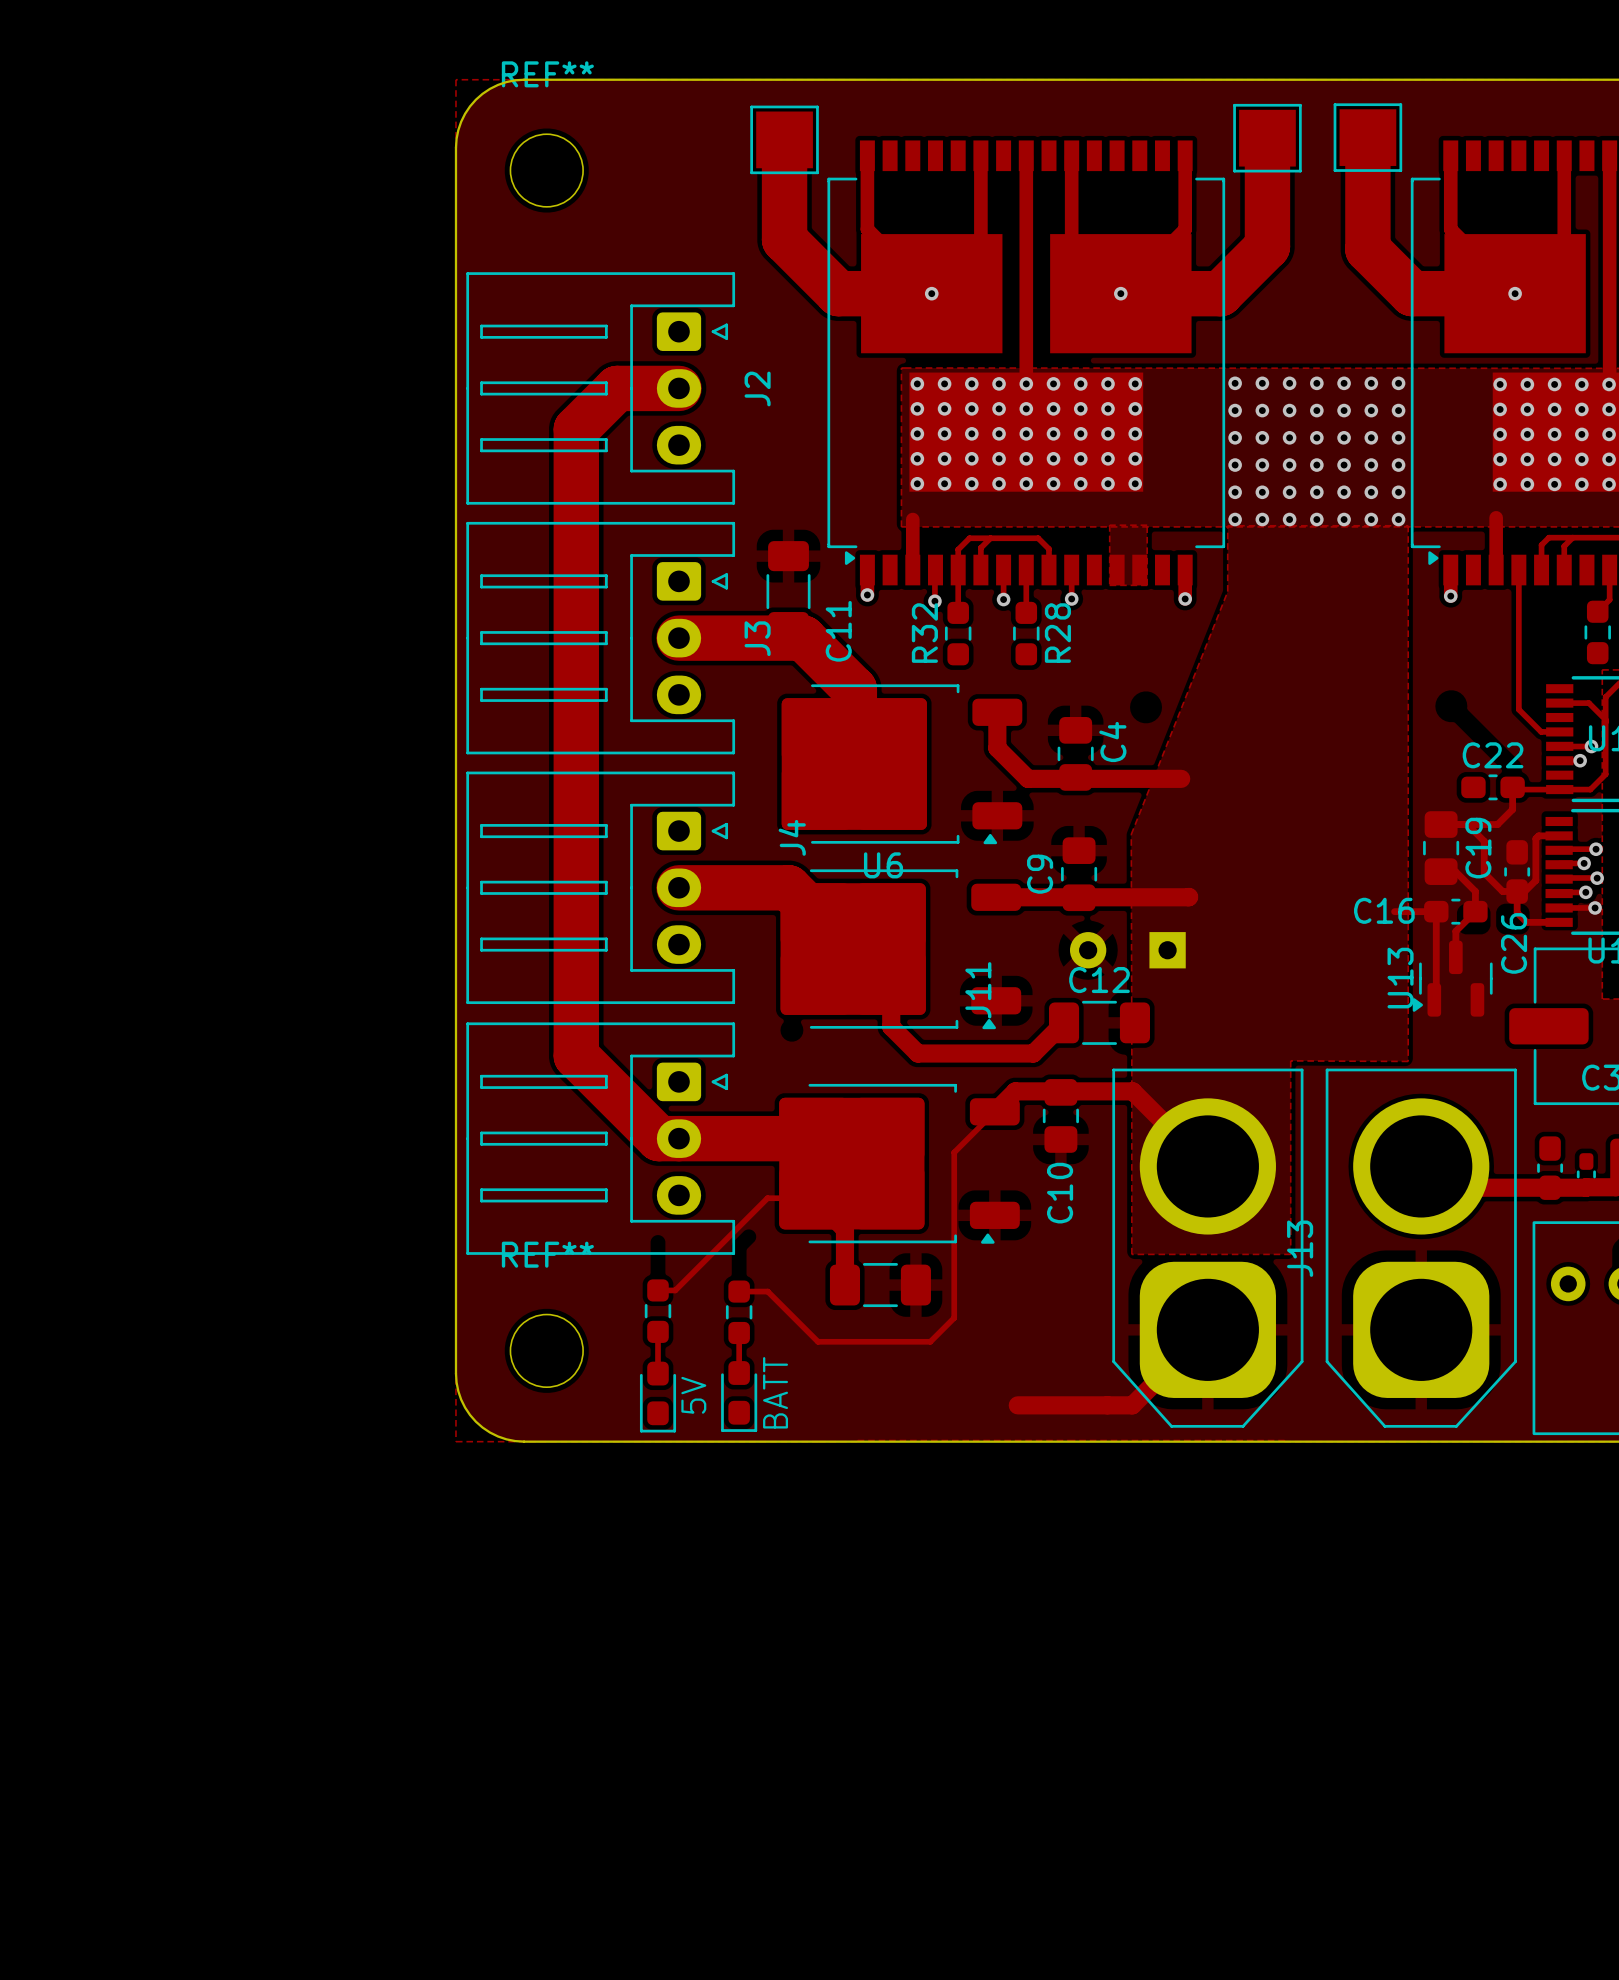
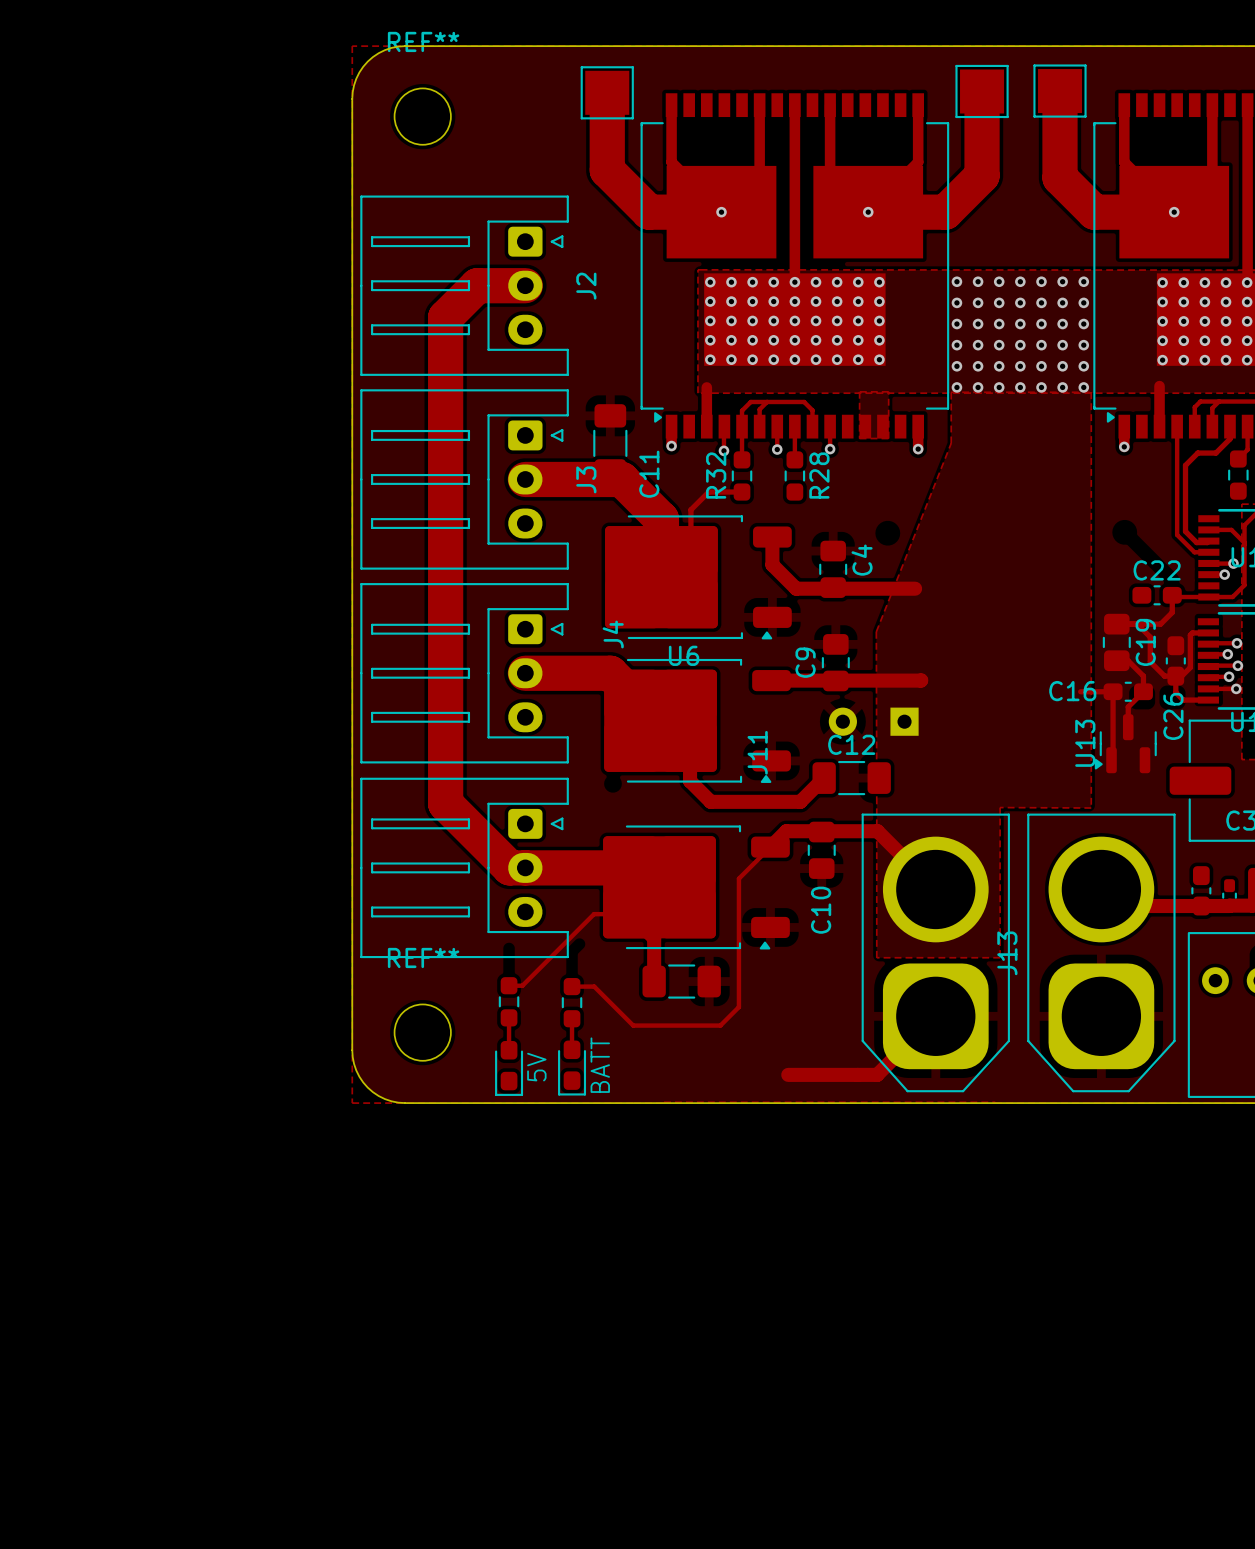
track: none -> (1229, 426) (1229, 439) (1215, 453) (1197, 453) (1185, 465) (1185, 531) (1196, 542) (1208, 541)
track: none -> (742, 492) (708, 492) (690, 509) (690, 550)

